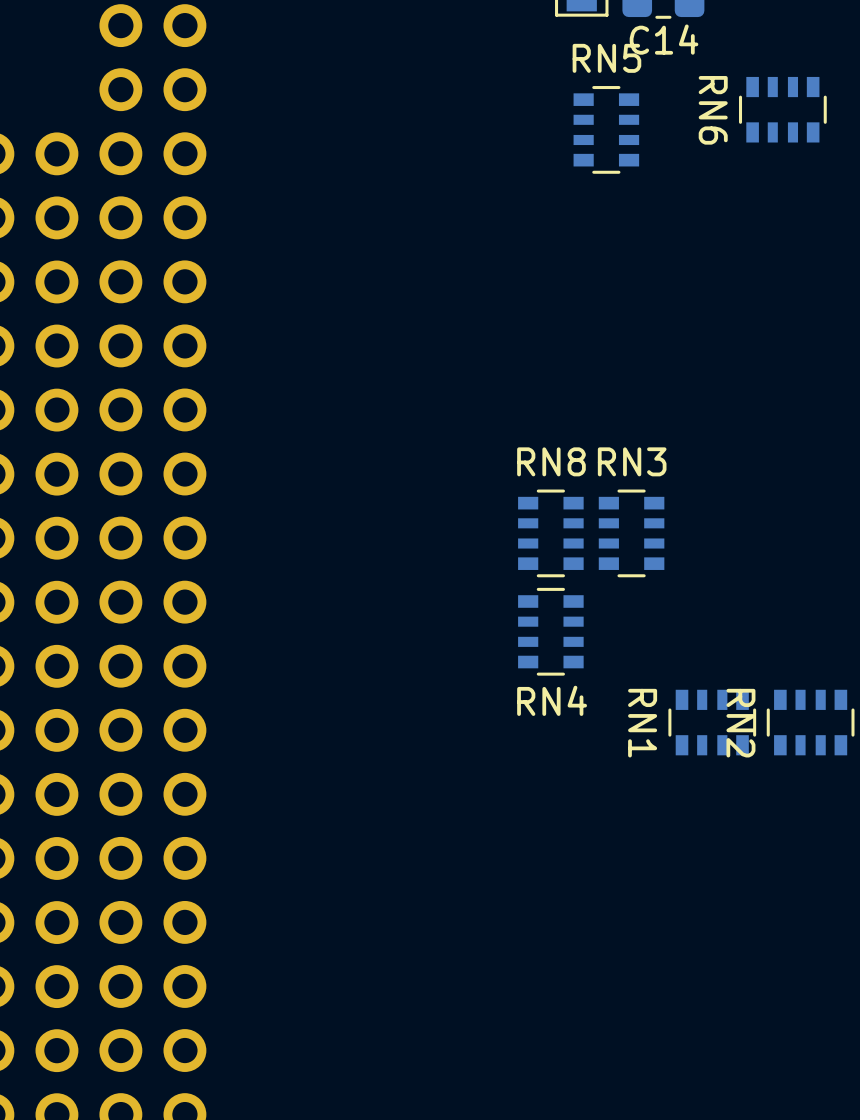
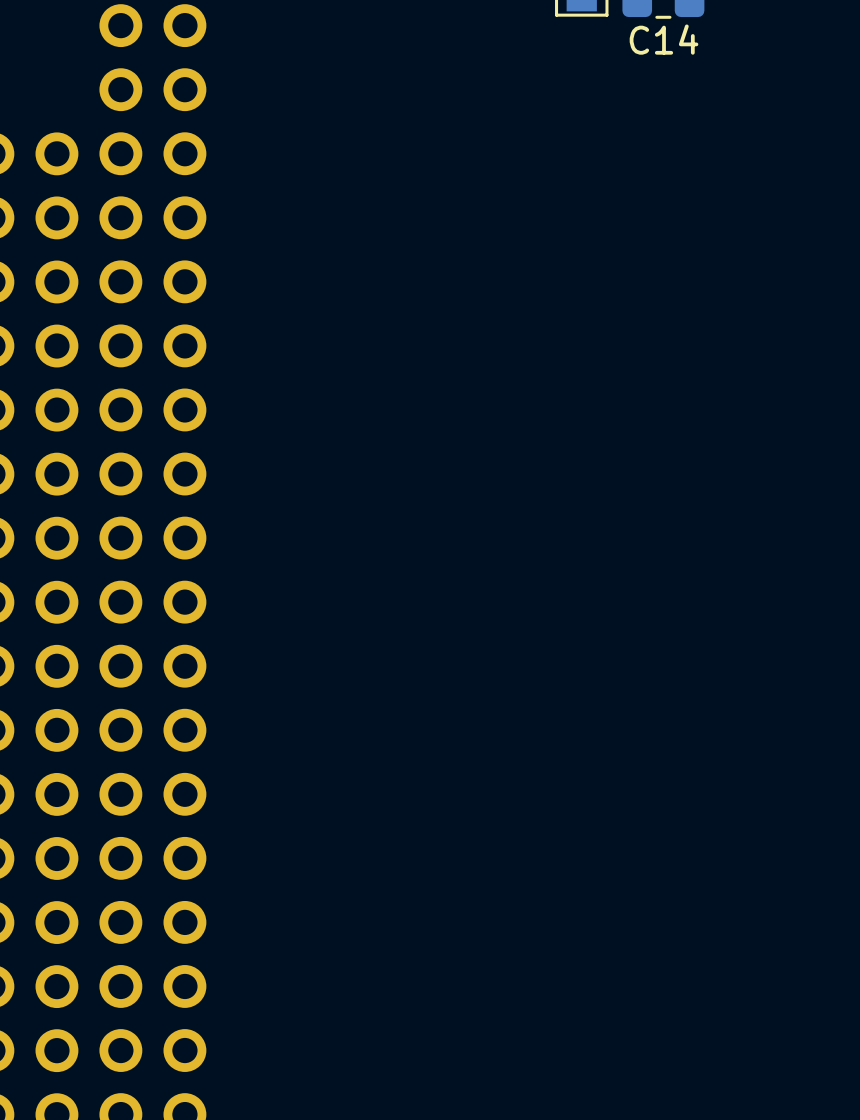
RN6: (782, 109) -> none
RN5: (606, 129) -> none
RN8: (550, 533) -> none
RN3: (631, 533) -> none
RN4: (550, 631) -> none
RN1: (712, 722) -> none
RN2: (810, 722) -> none

